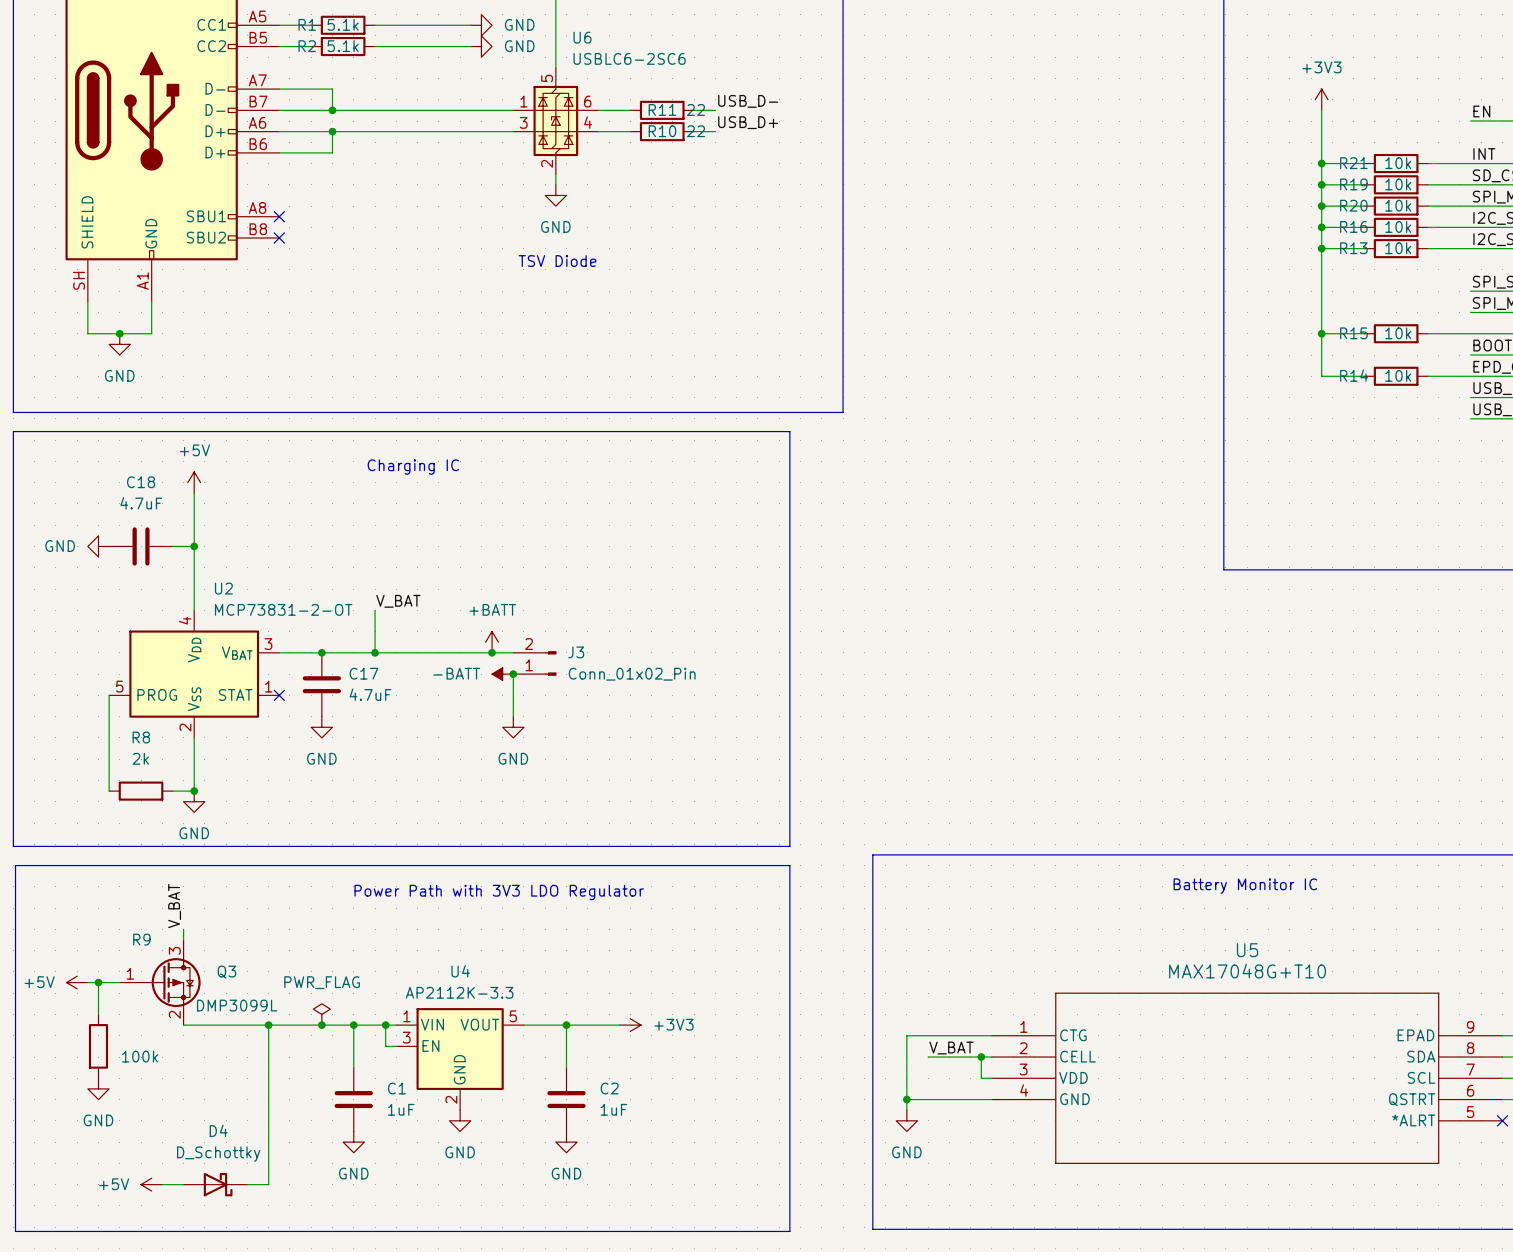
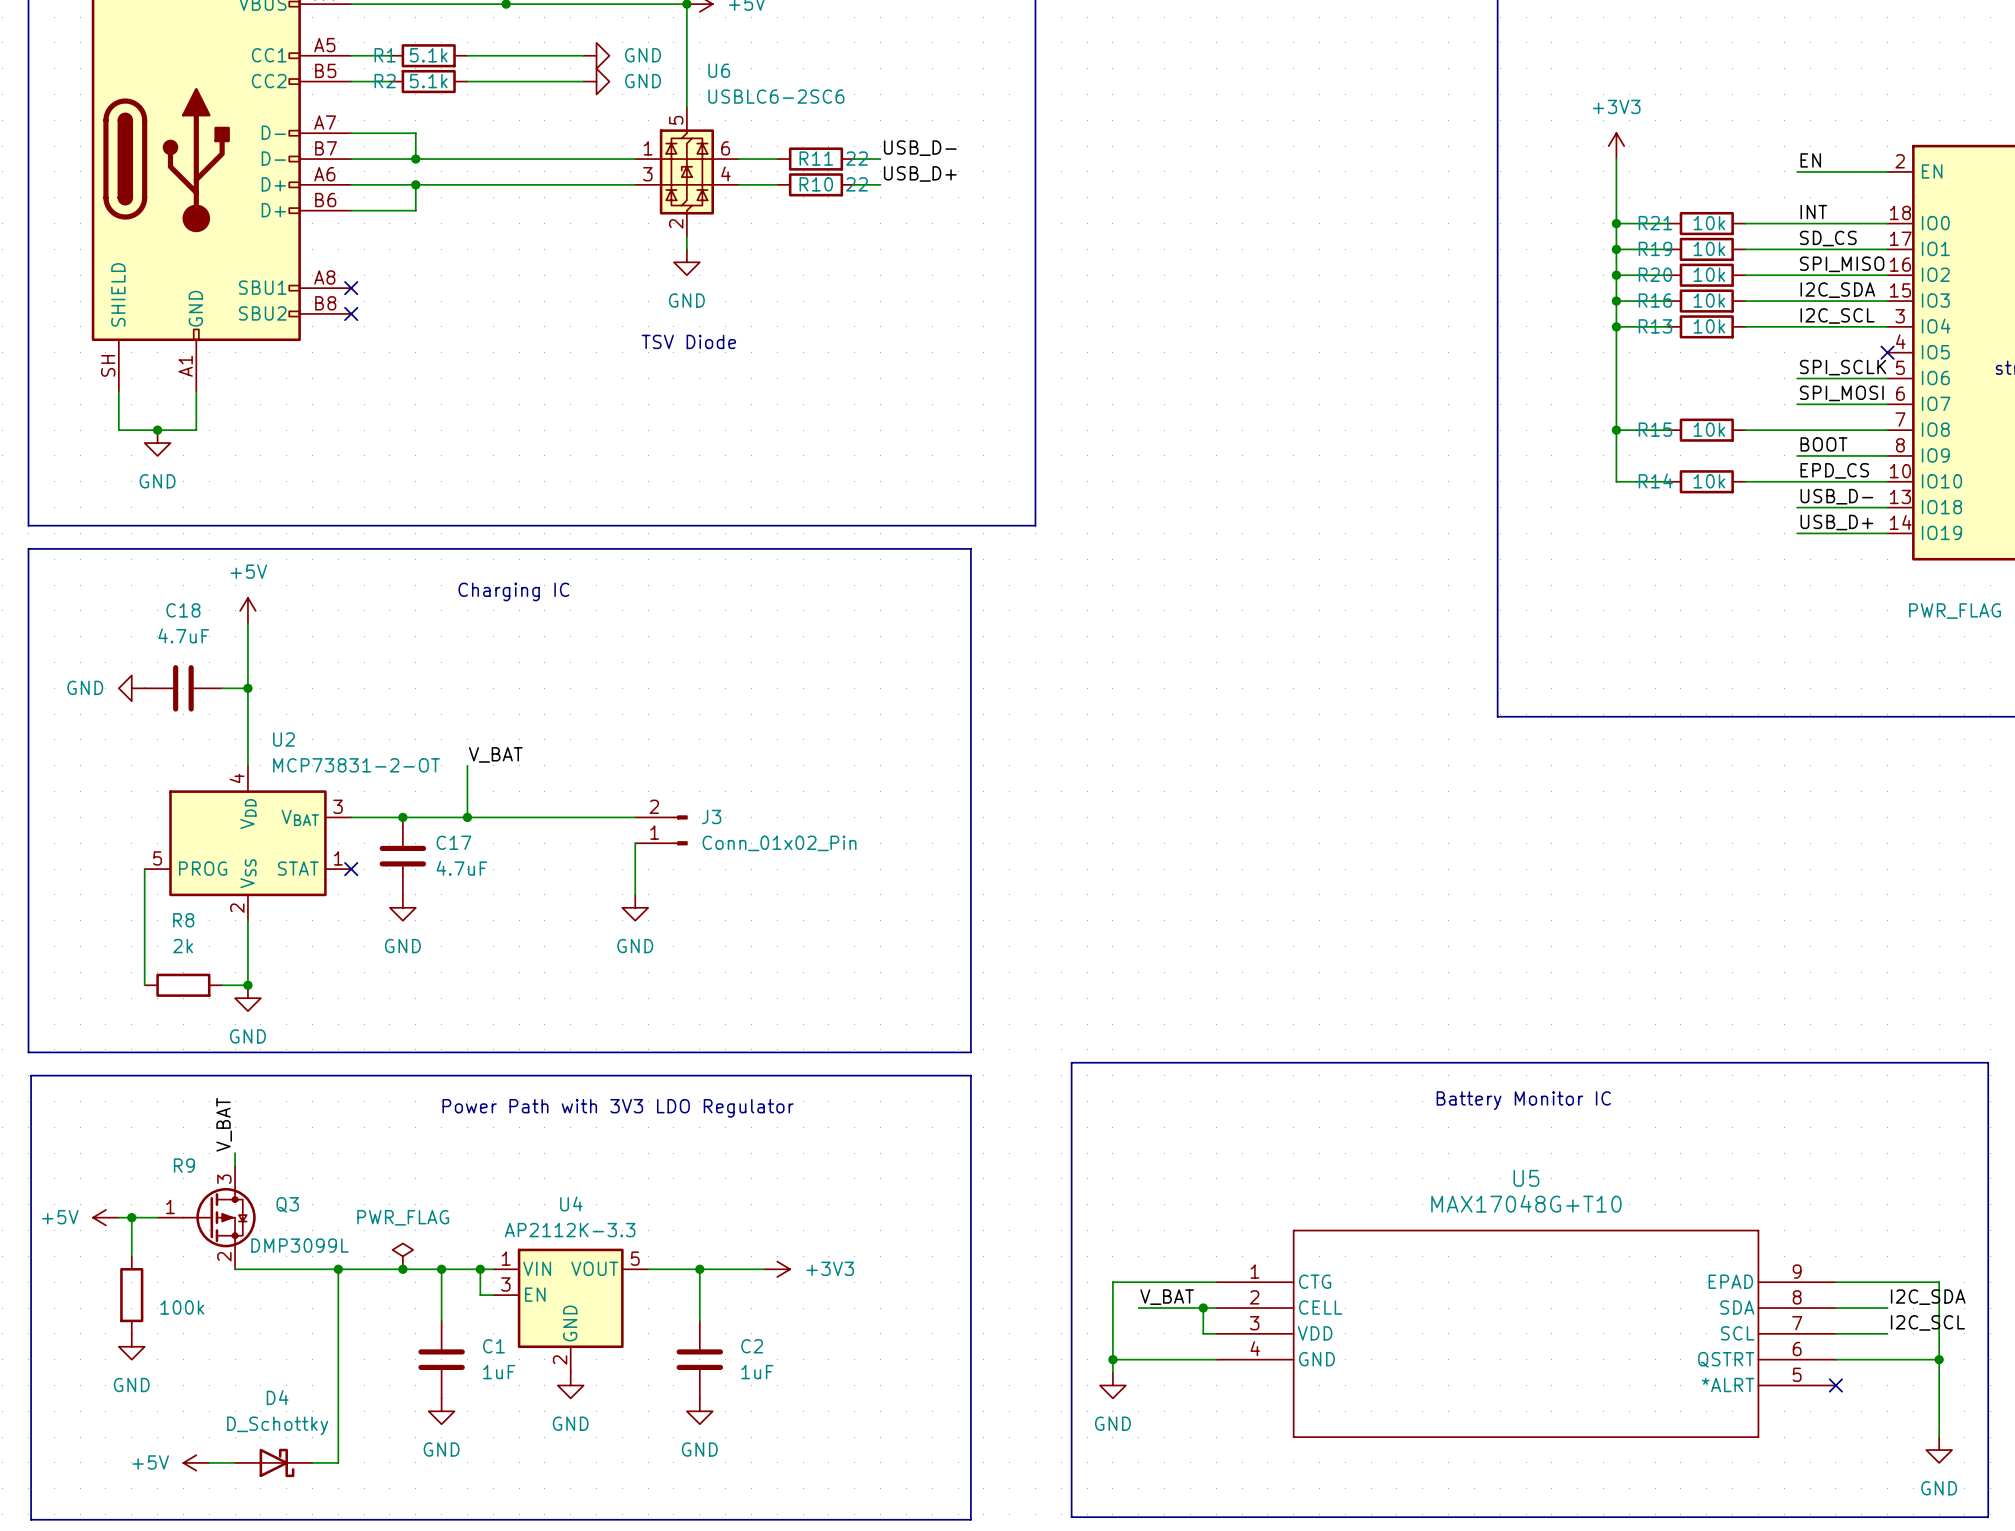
power symbol: +BATT (492, 642) -> none
junction: (492, 652) -> none
power symbol: -BATT (502, 674) -> none
junction: (513, 674) -> none

